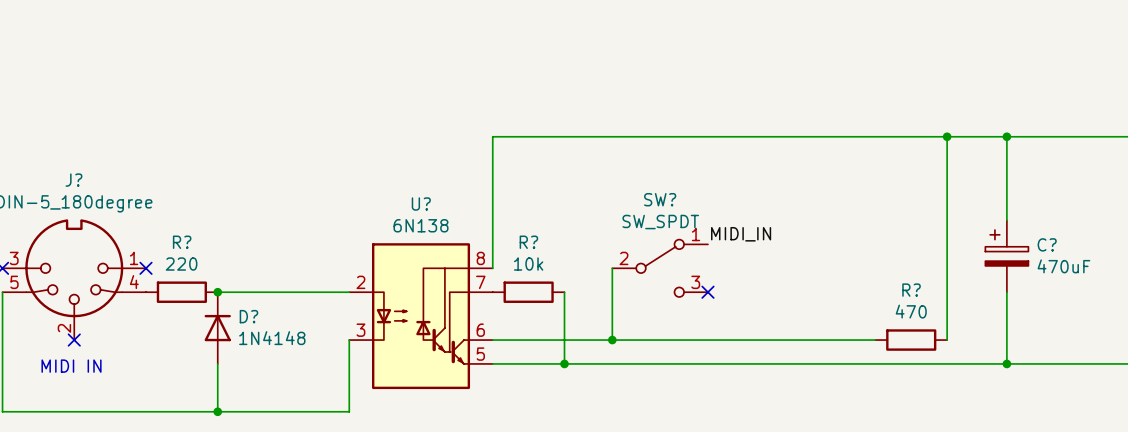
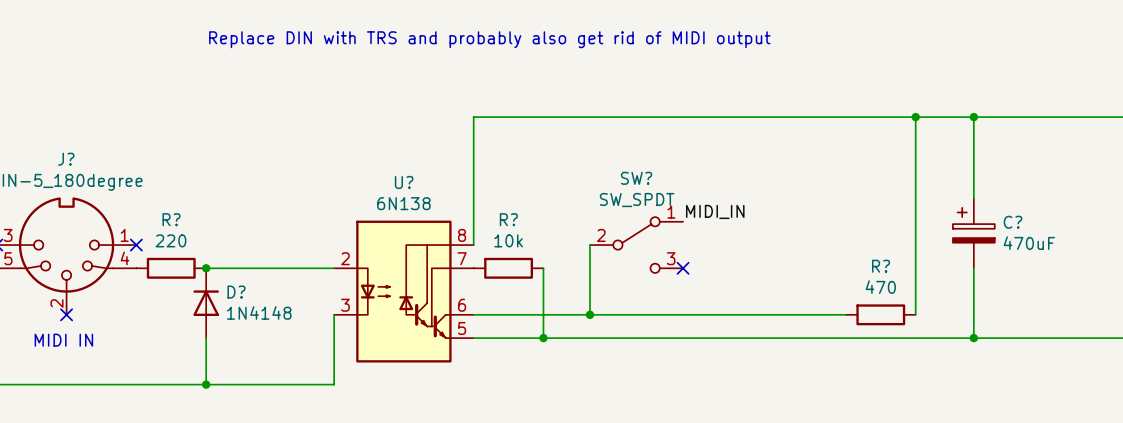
text: none -> Replace DIN with TRS and probably also get rid of MIDI output (489, 39)

